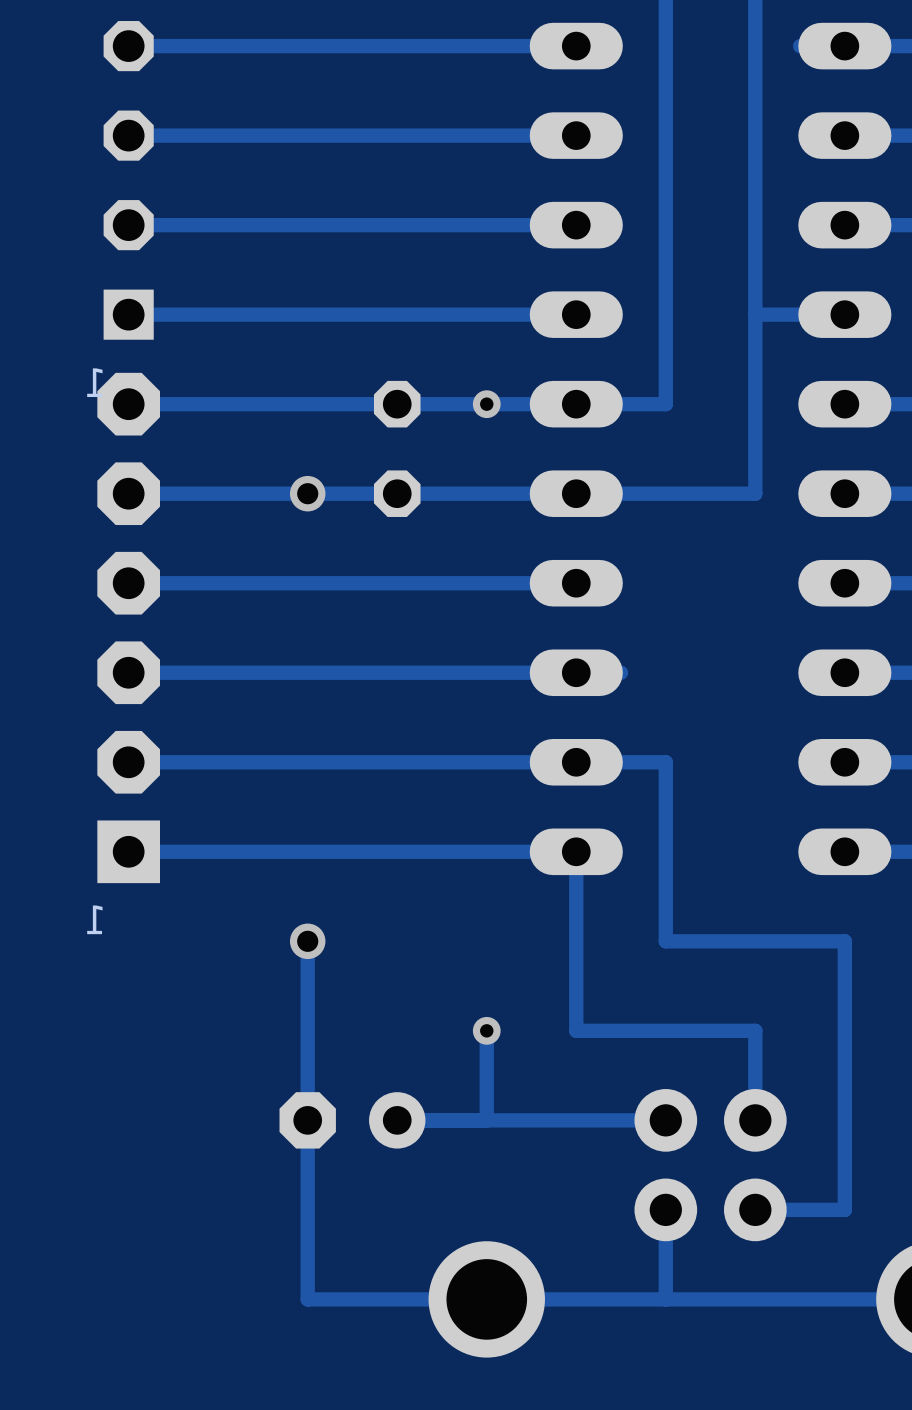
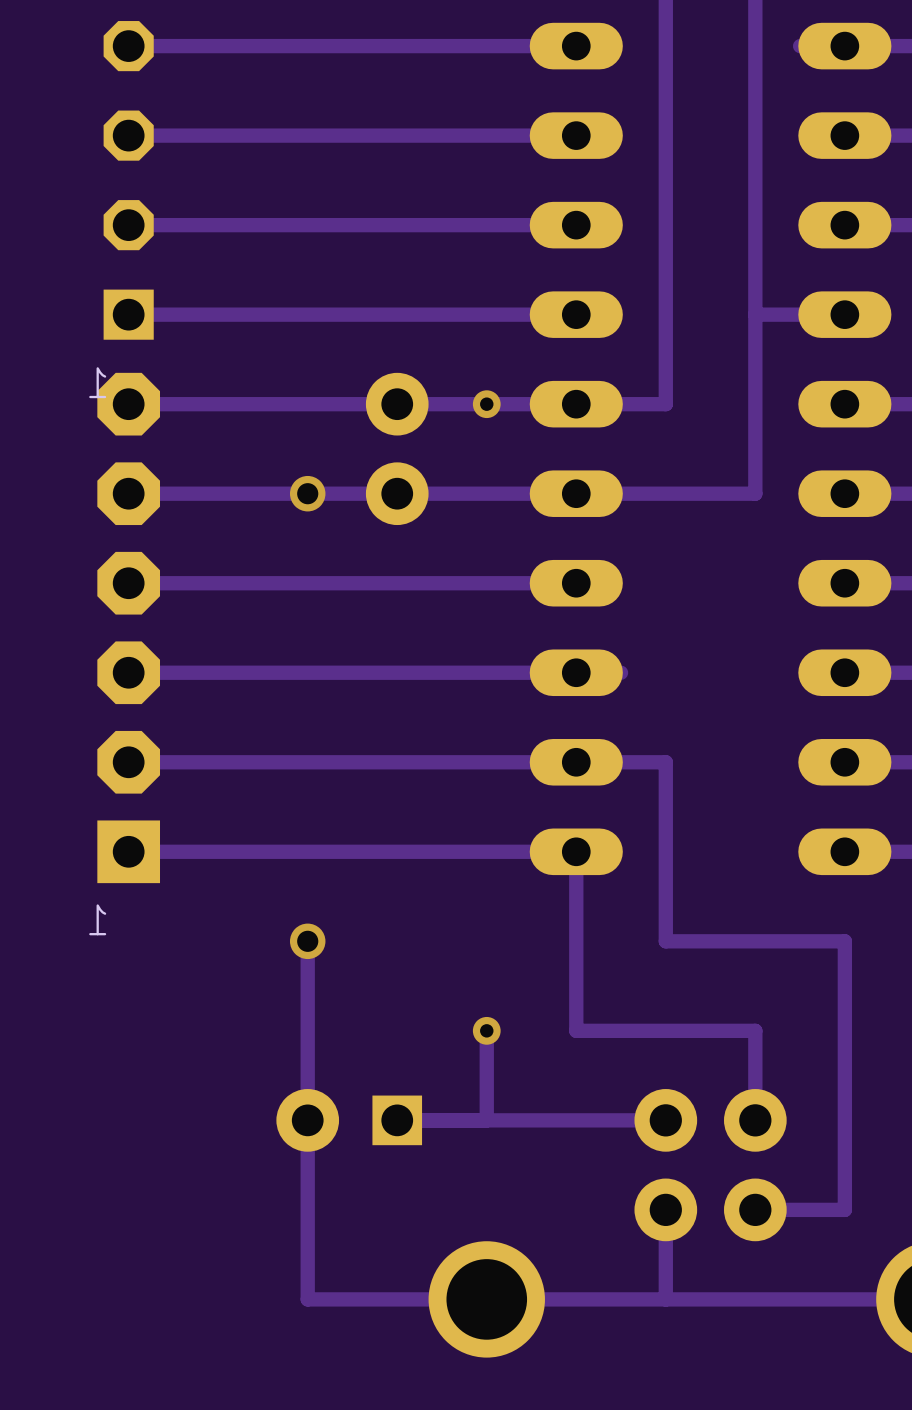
part footprint: [373, 380, 421, 517] -> [365, 372, 429, 526]
part footprint: [279, 1092, 426, 1149] -> [276, 1089, 423, 1152]

